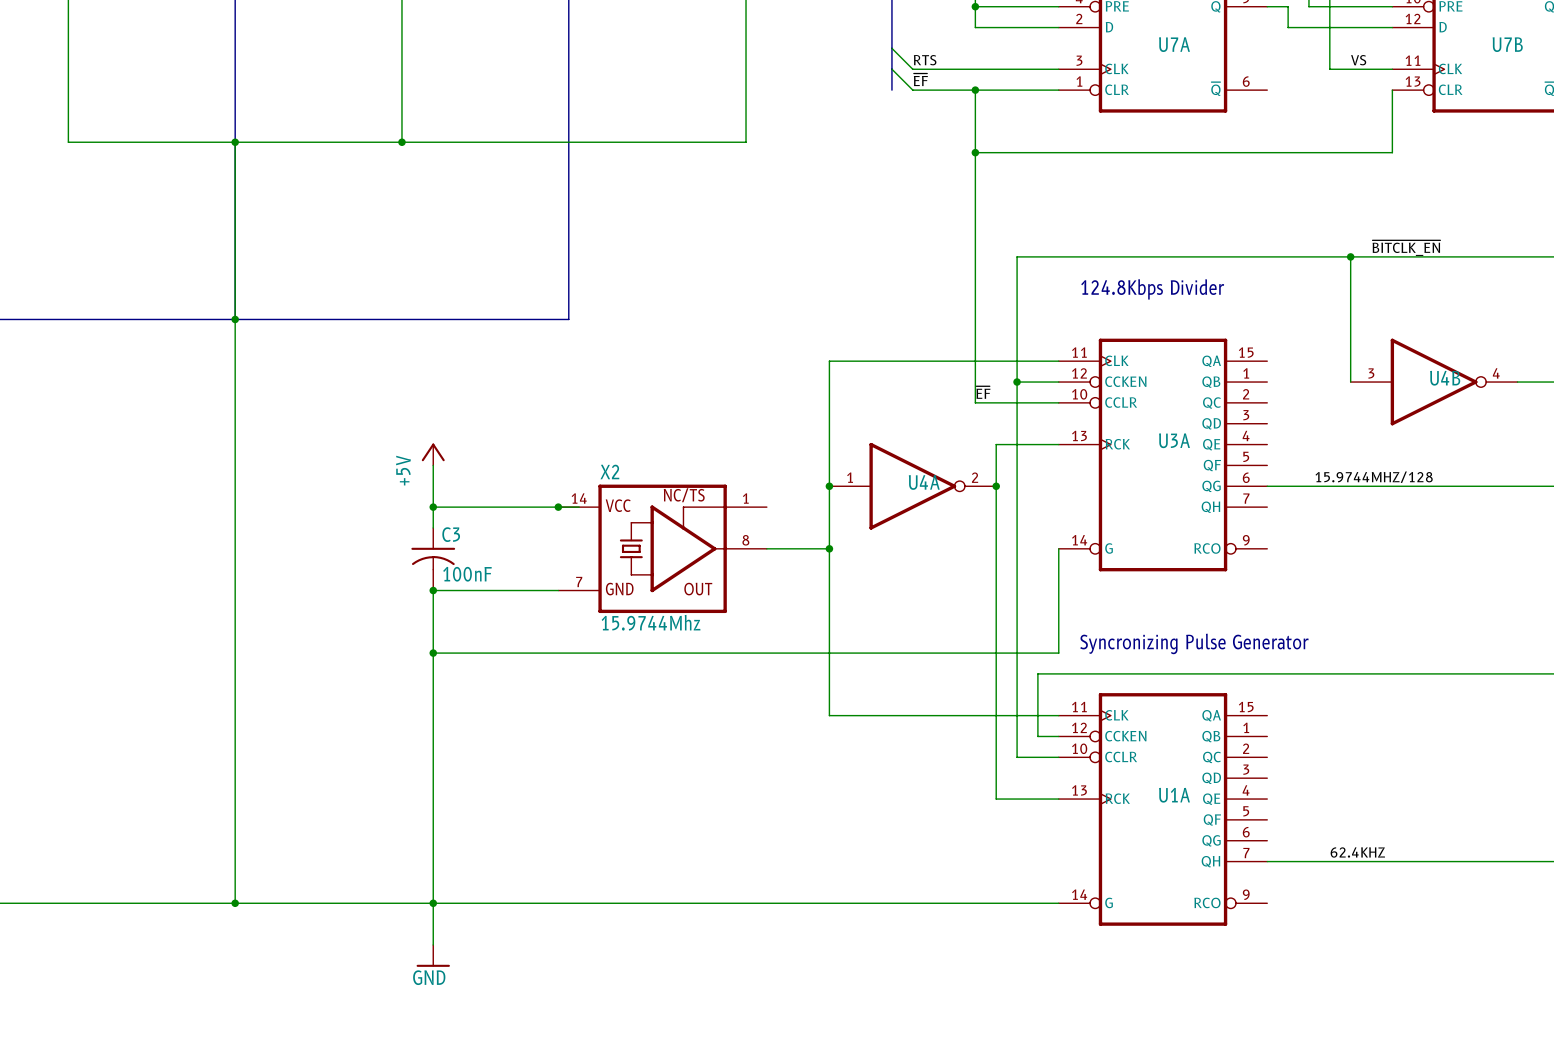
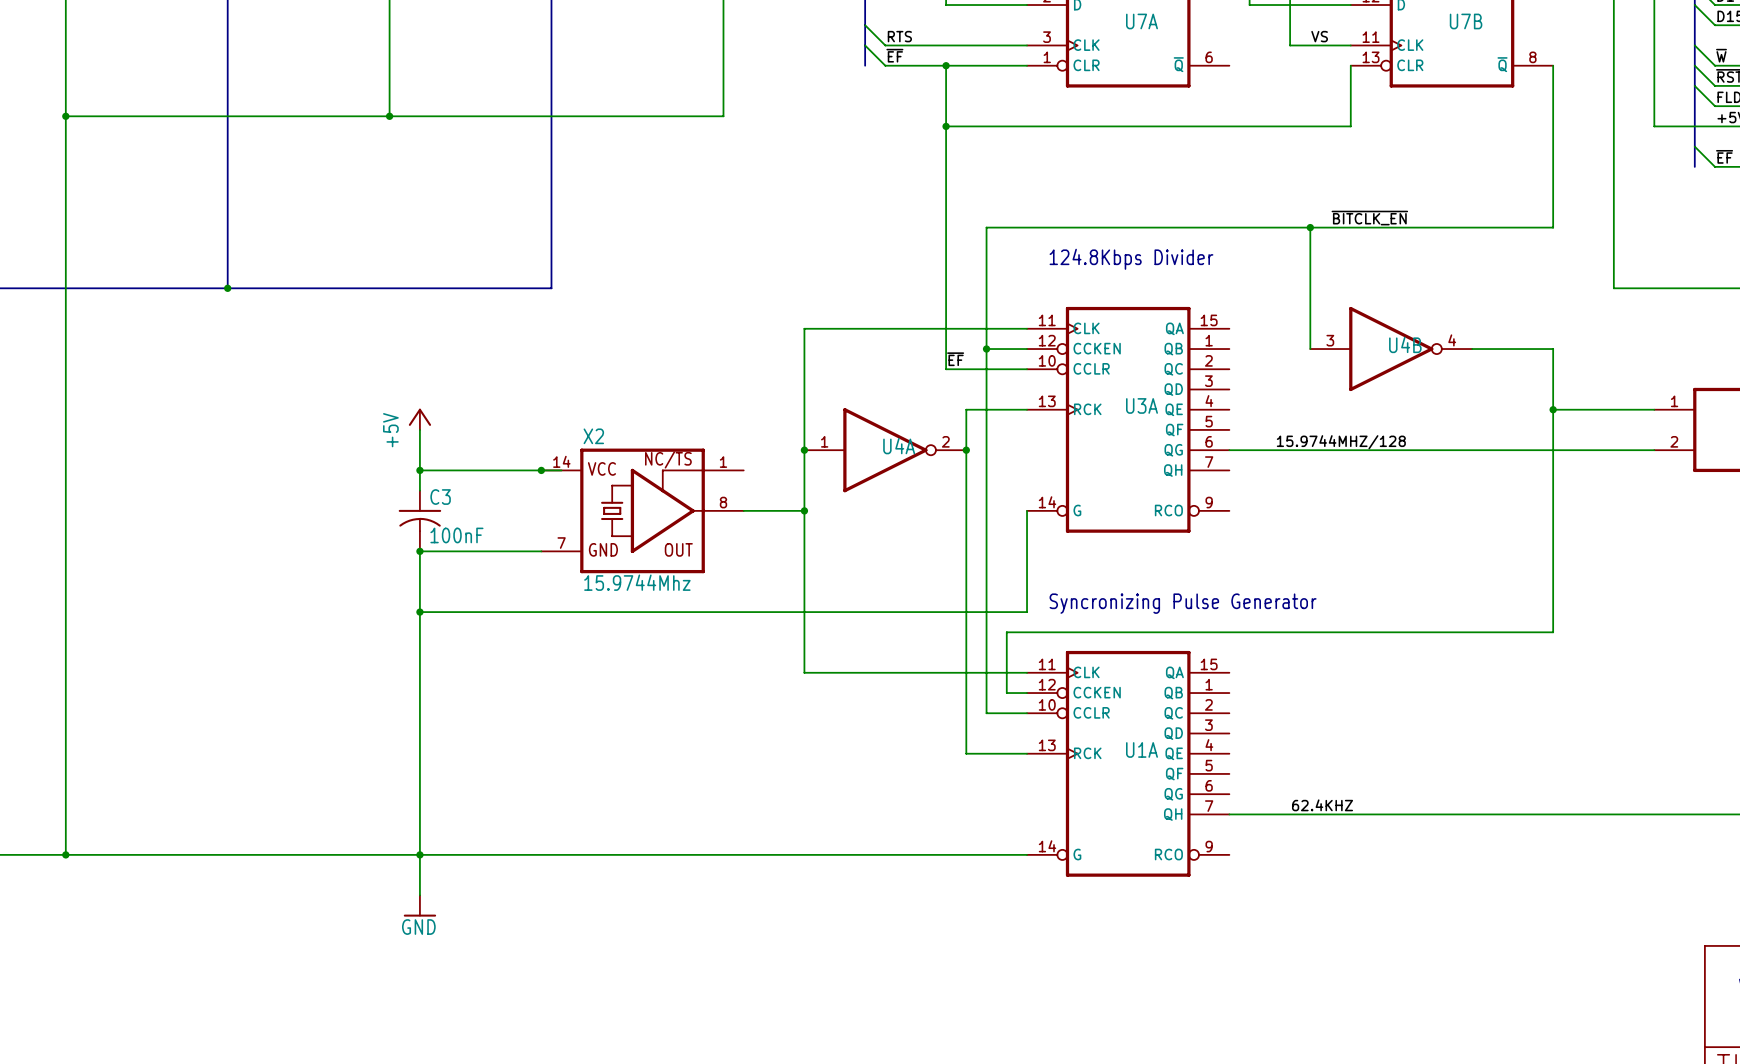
junction: none -> (65, 116)
wire: (235, 142) (235, 903) -> (65, 116) (65, 854)
junction: (235, 142) -> none
junction: none -> (65, 854)
junction: (235, 903) -> none

